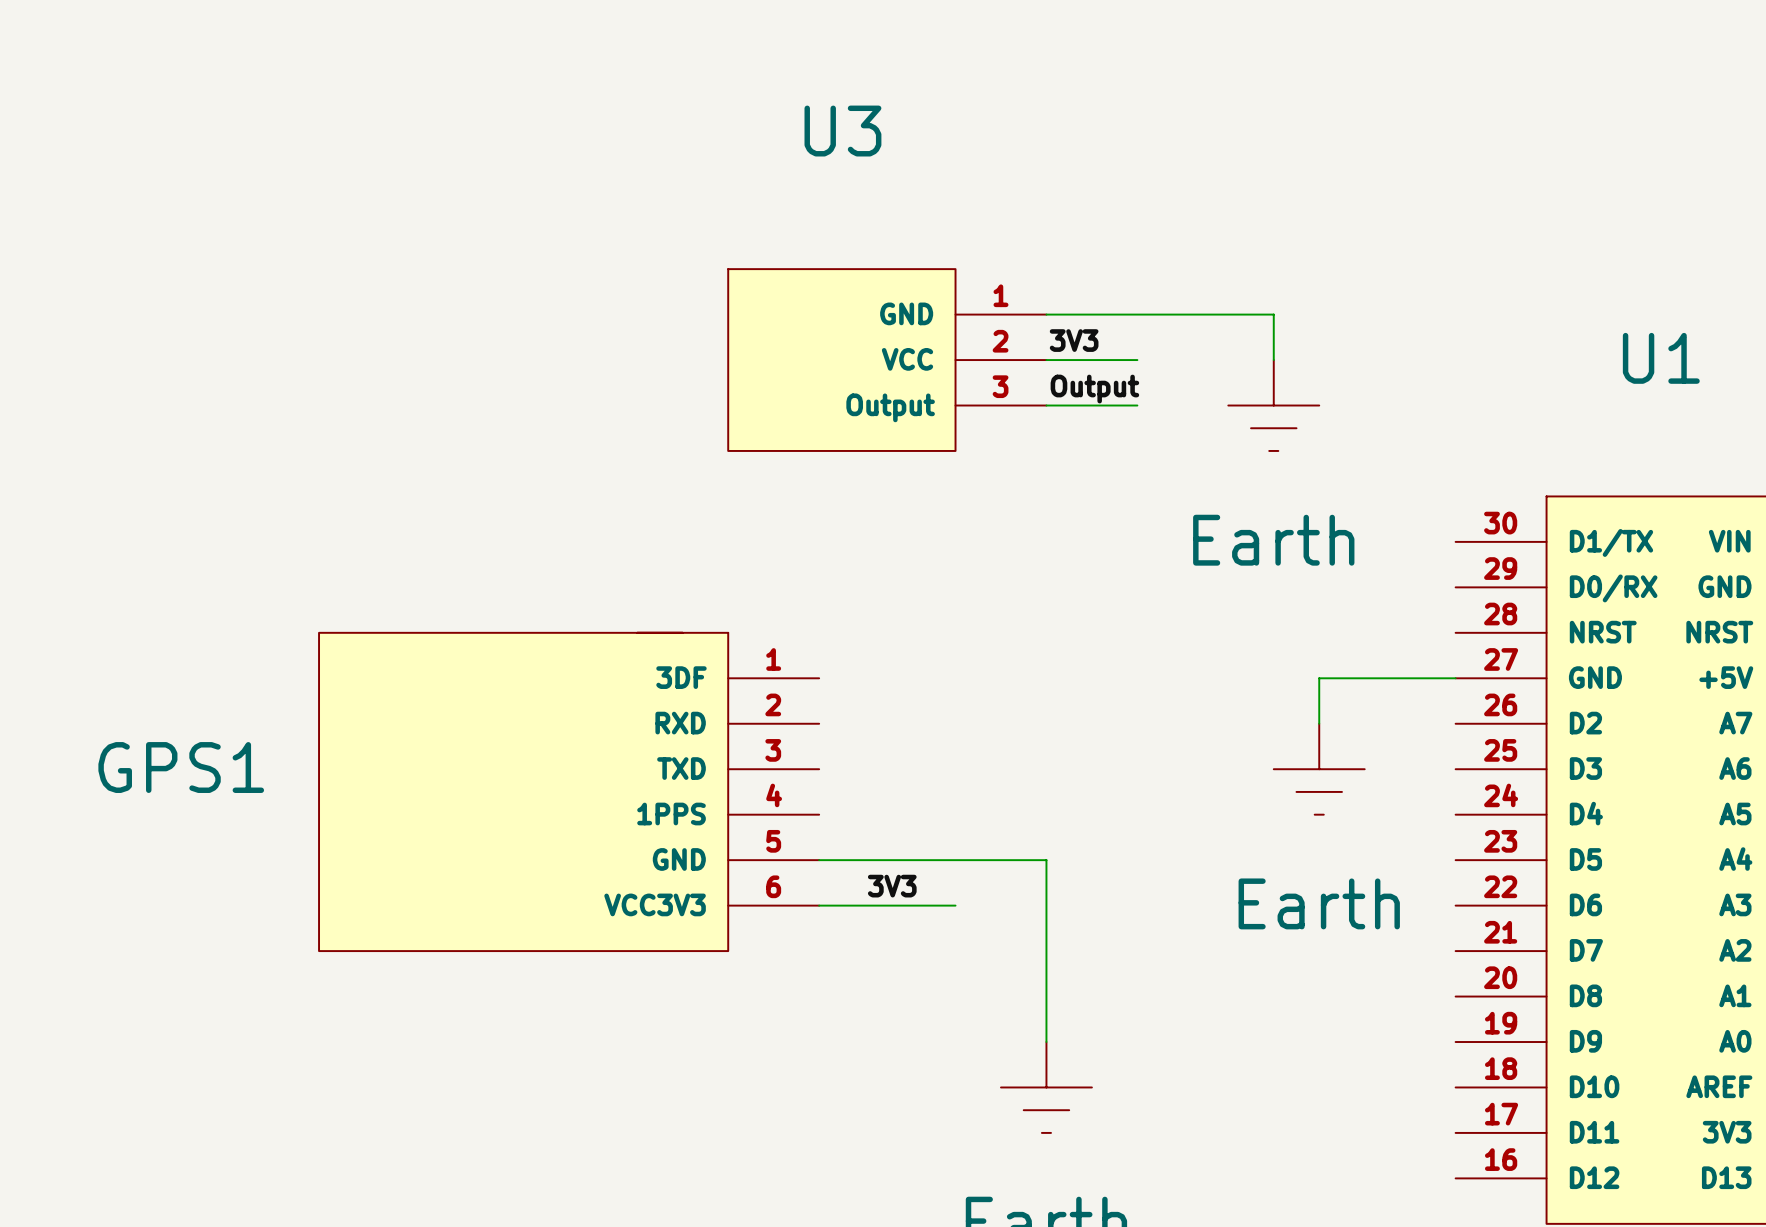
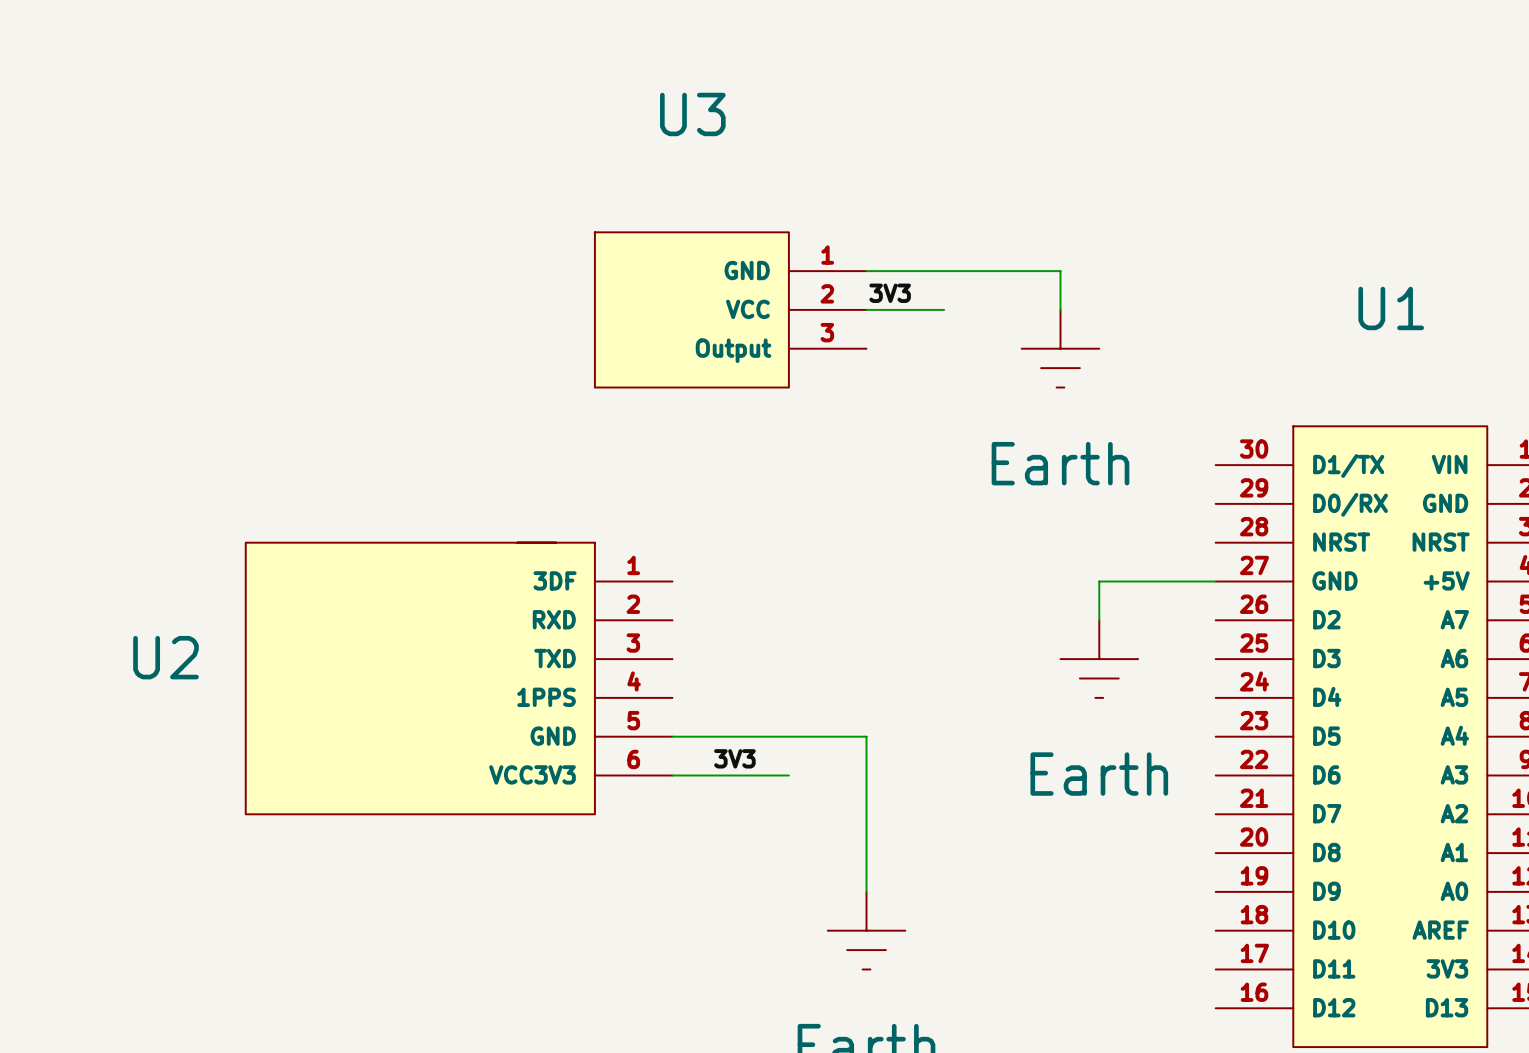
label: Output (1094, 389) -> none
wire: (1046, 405) (1137, 405) -> none
GPS1 name: GPS1 (181, 767) -> U2 (166, 657)

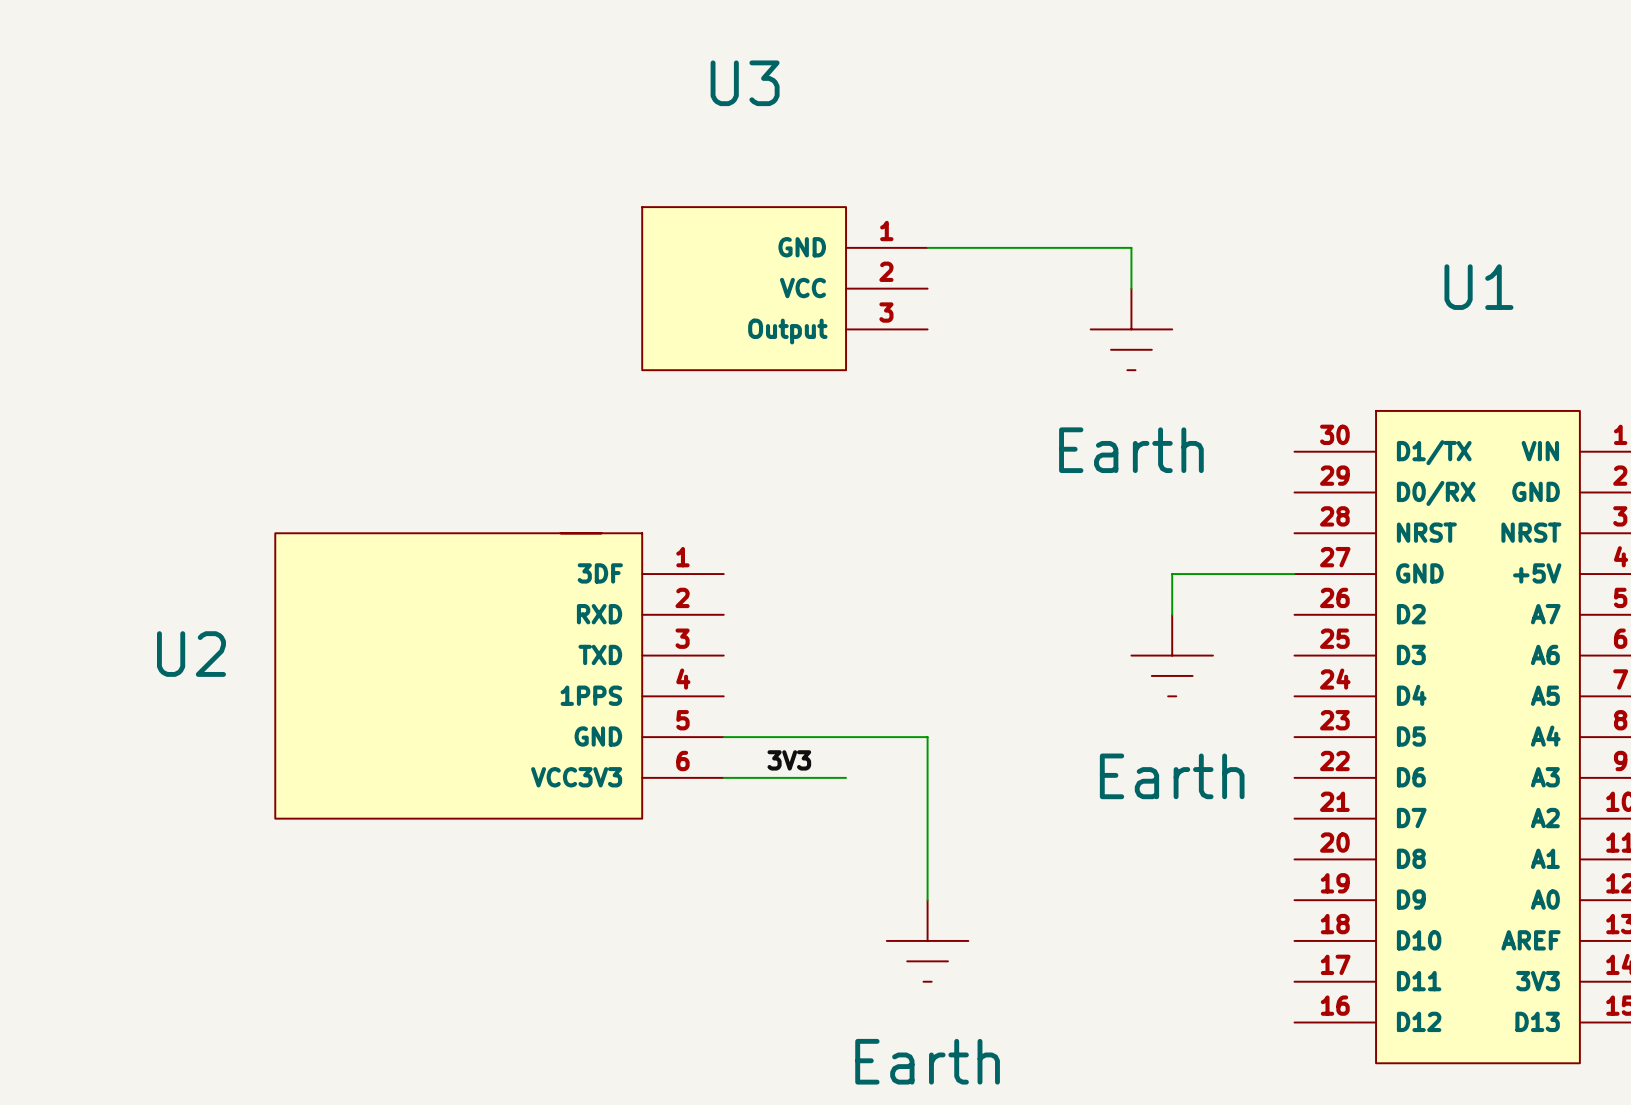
label: 3V3 (890, 293) -> none
wire: (866, 309) (944, 309) -> none

